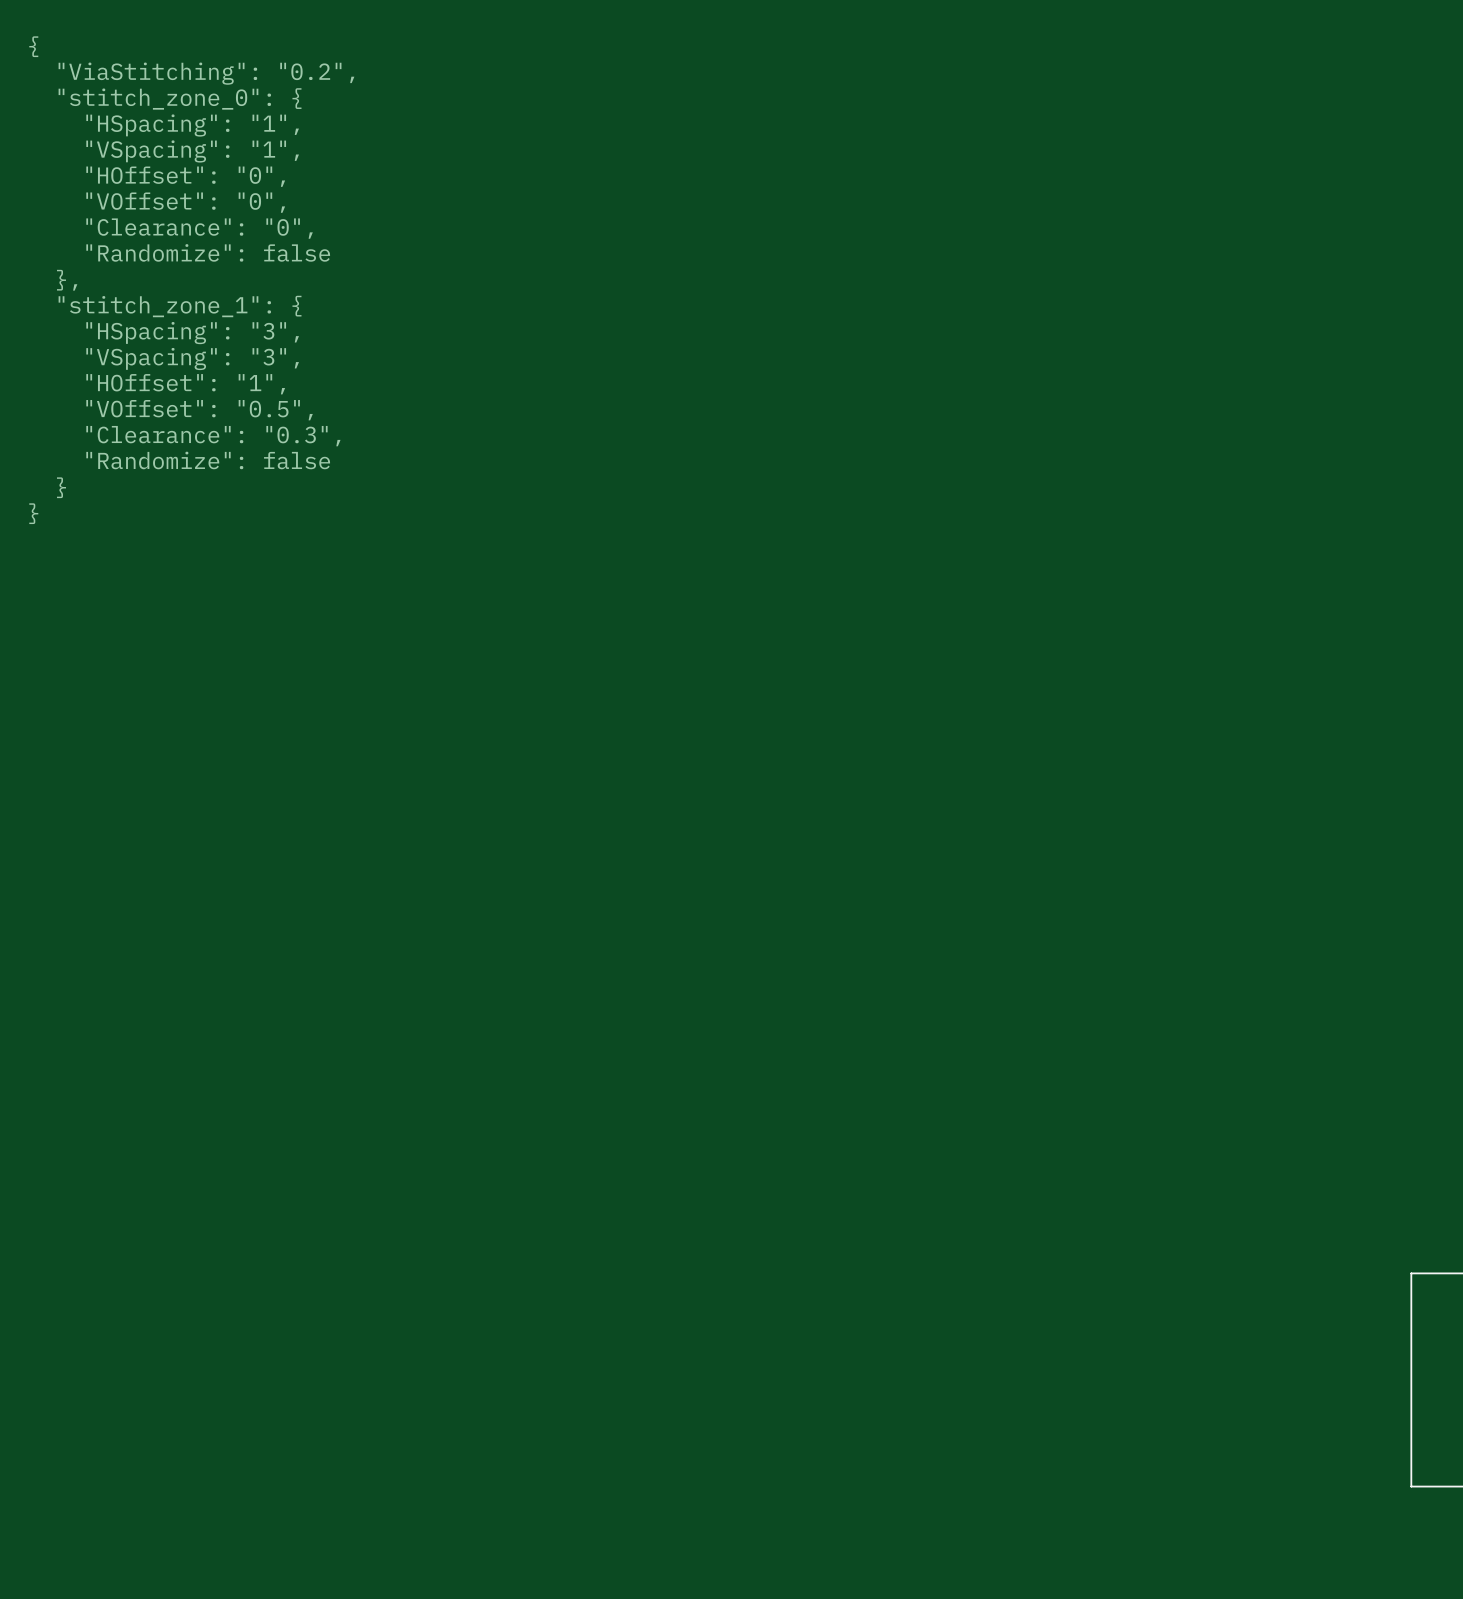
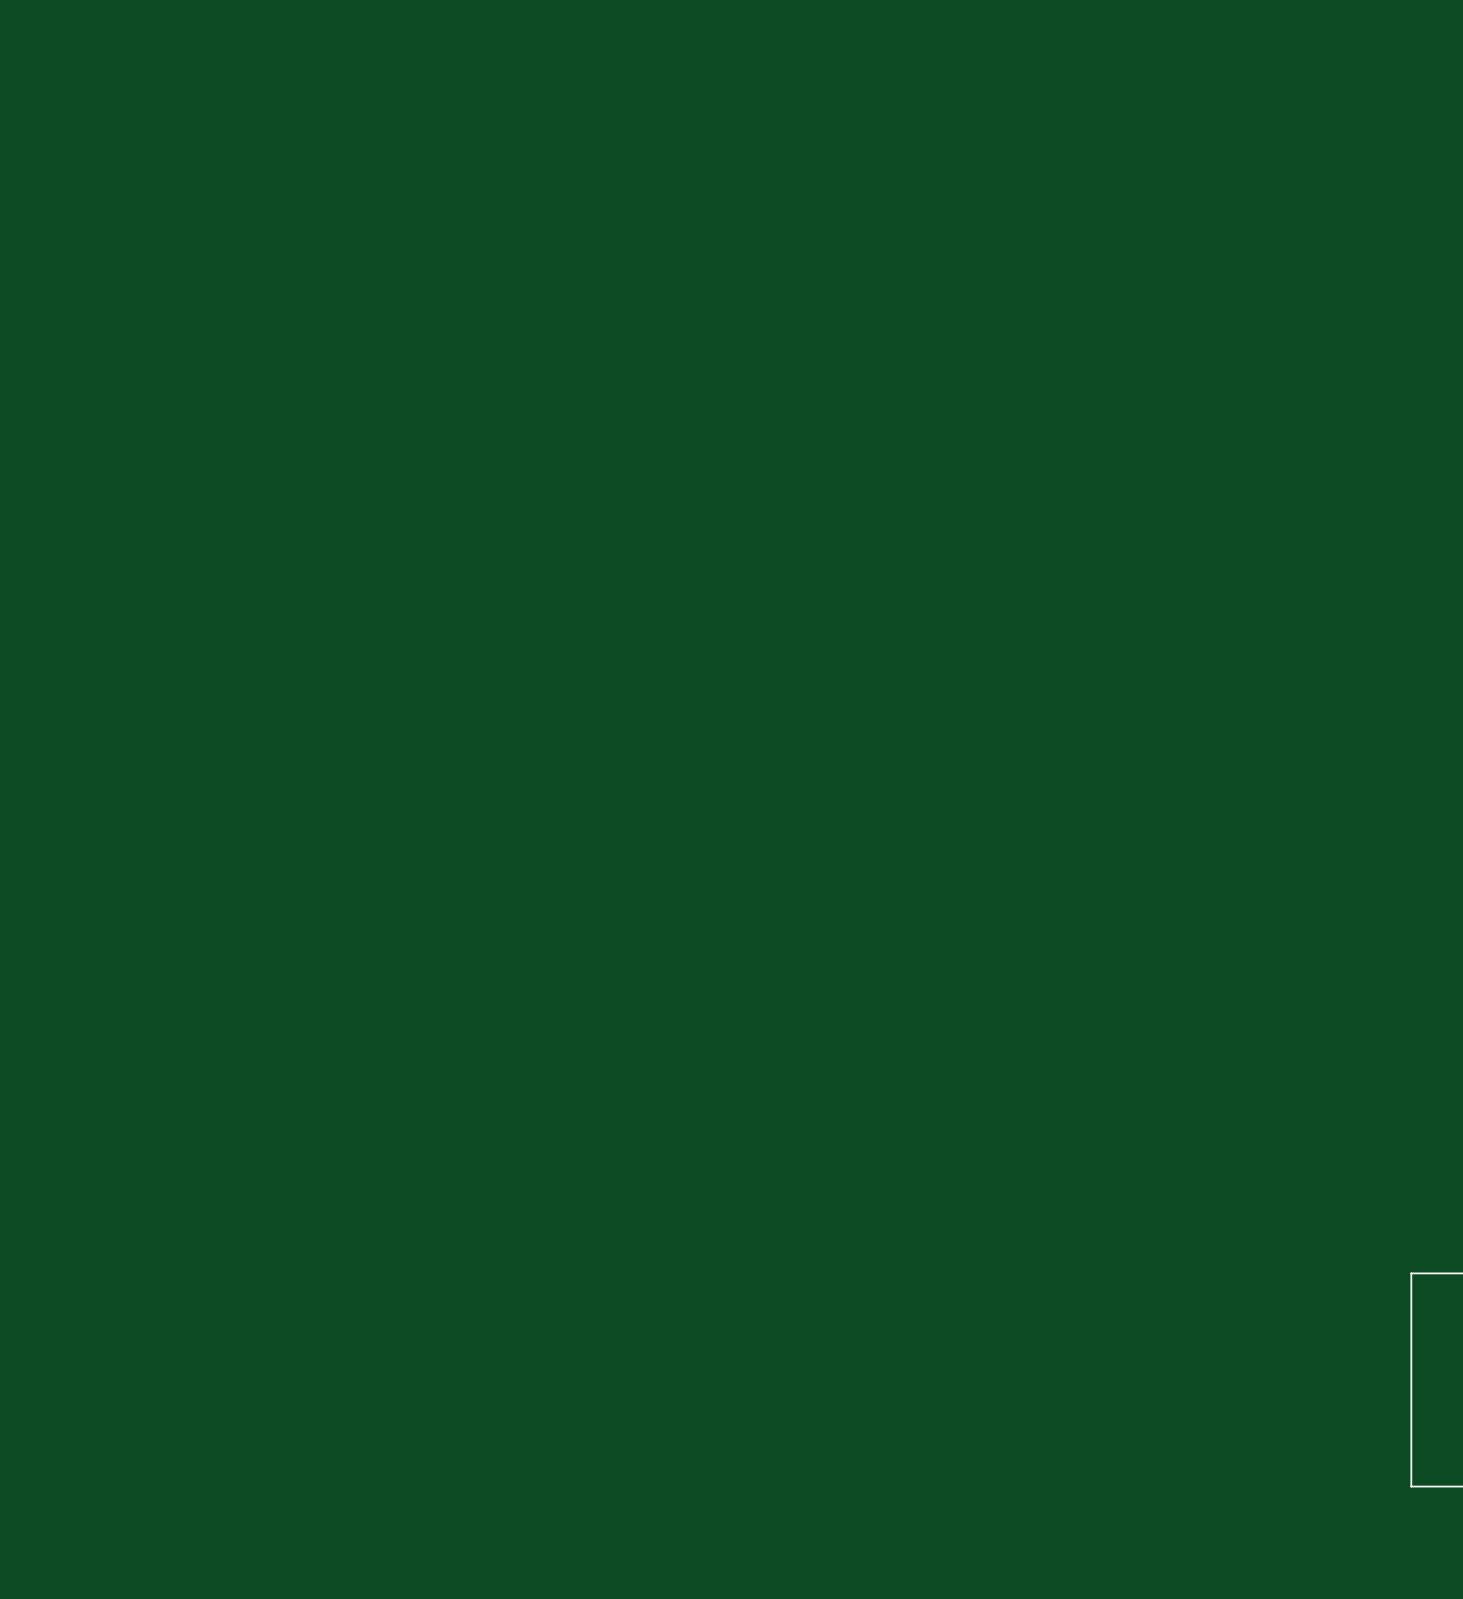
text: { (33, 46) -> none
text: "ViaStitching": "0.2", (206, 73) -> none
text: "stitch_zone_0": { (180, 98) -> none
text: "HSpacing": "1", (192, 125) -> none
text: "VSpacing": "1", (192, 151) -> none
text: "HOffset": "0", (185, 176) -> none
text: "VOffset": "0", (185, 202) -> none
text: "Clearance": "0", (199, 228) -> none
text: "Randomize": false (208, 252) -> none
text: }, (67, 280) -> none
text: "stitch_zone_1": { (180, 306) -> none
text: "HSpacing": "3", (192, 333) -> none
text: "VSpacing": "3", (192, 359) -> none
text: "HOffset": "1", (185, 384) -> none
text: "VOffset": "0.5", (199, 410) -> none
text: "Clearance": "0.3", (213, 436) -> none
text: "Randomize": false (208, 460) -> none
text: } (61, 487) -> none
text: } (33, 513) -> none

